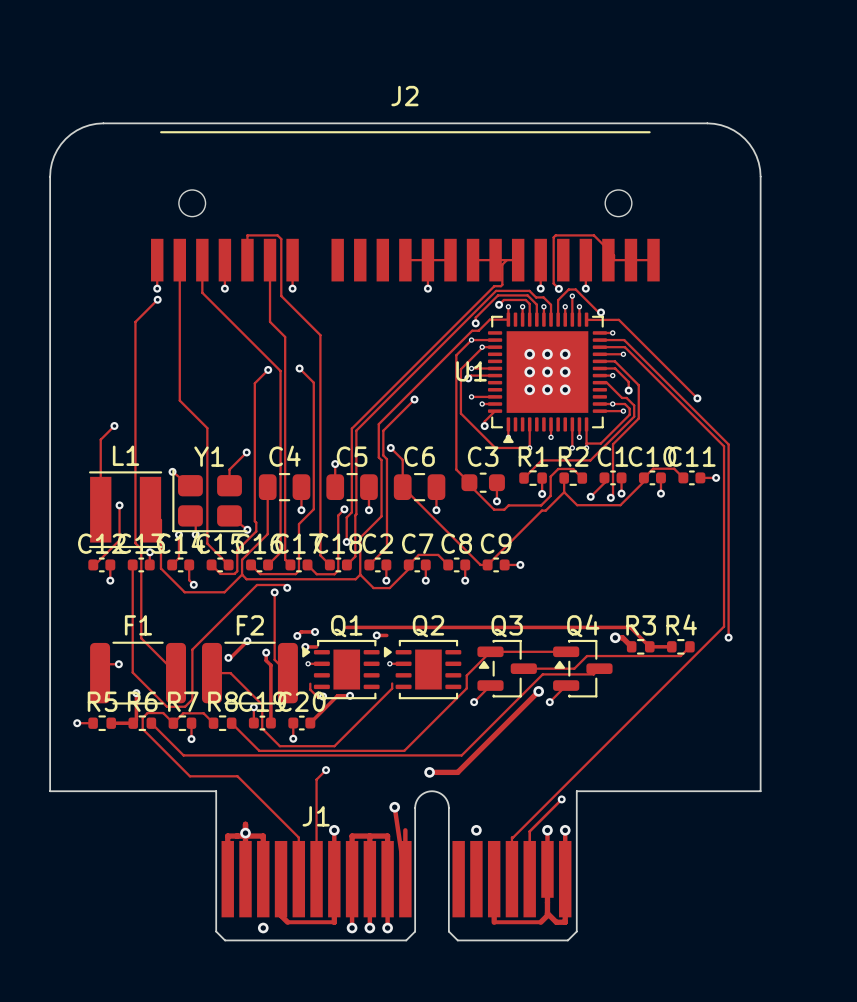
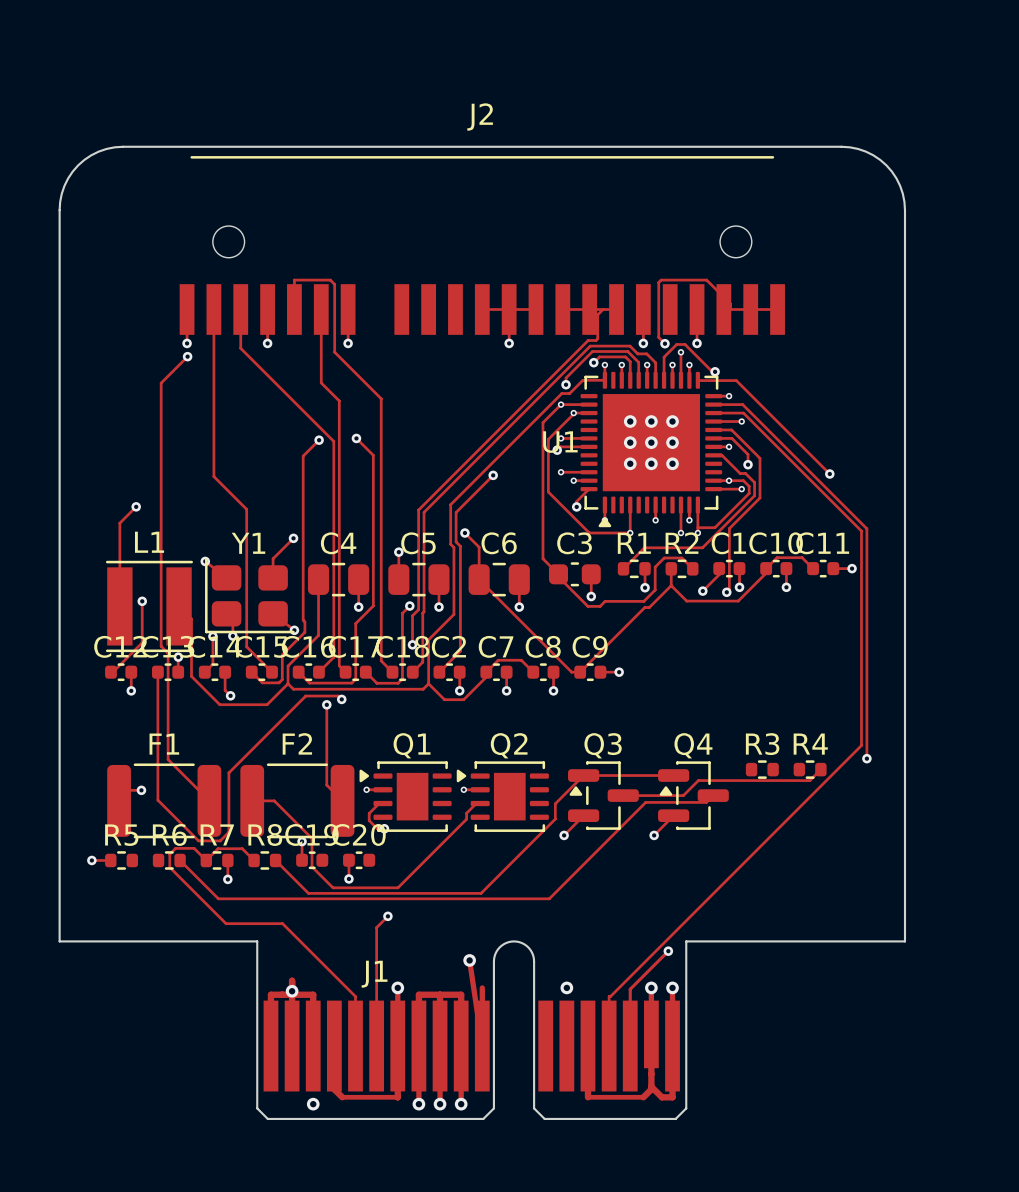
track: (346, 627) (630, 627) (649, 646) (671, 646) -> none
track: (315, 631) (301, 631) (297, 635) -> none
via: (315, 631) -> none
via: (297, 635) -> none
track: (376, 635) (386, 635) -> none
via: (376, 635) -> none
track: (615, 637) (622, 637) (631, 646) -> none
via: (615, 637) -> none
track: (247, 641) (228, 657) -> none
via: (247, 641) -> none
track: (305, 646) (316, 646) -> none
via: (305, 646) -> none
track: (266, 652) (266, 660) (270, 665) (270, 723) -> none
via: (266, 652) -> none
via: (228, 657) -> none
track: none -> (382, 803) (379, 803) (369, 813)
track: none -> (480, 803) (476, 803) (466, 813)
track: (538, 691) (457, 772) (429, 772) -> none
via: (538, 691) -> none
track: (136, 693) (136, 720) (133, 723) (111, 723) -> none
via: (136, 693) -> none
track: (350, 695) (337, 695) (310, 723) -> none
via: (350, 695) -> none
via: (429, 772) -> none

